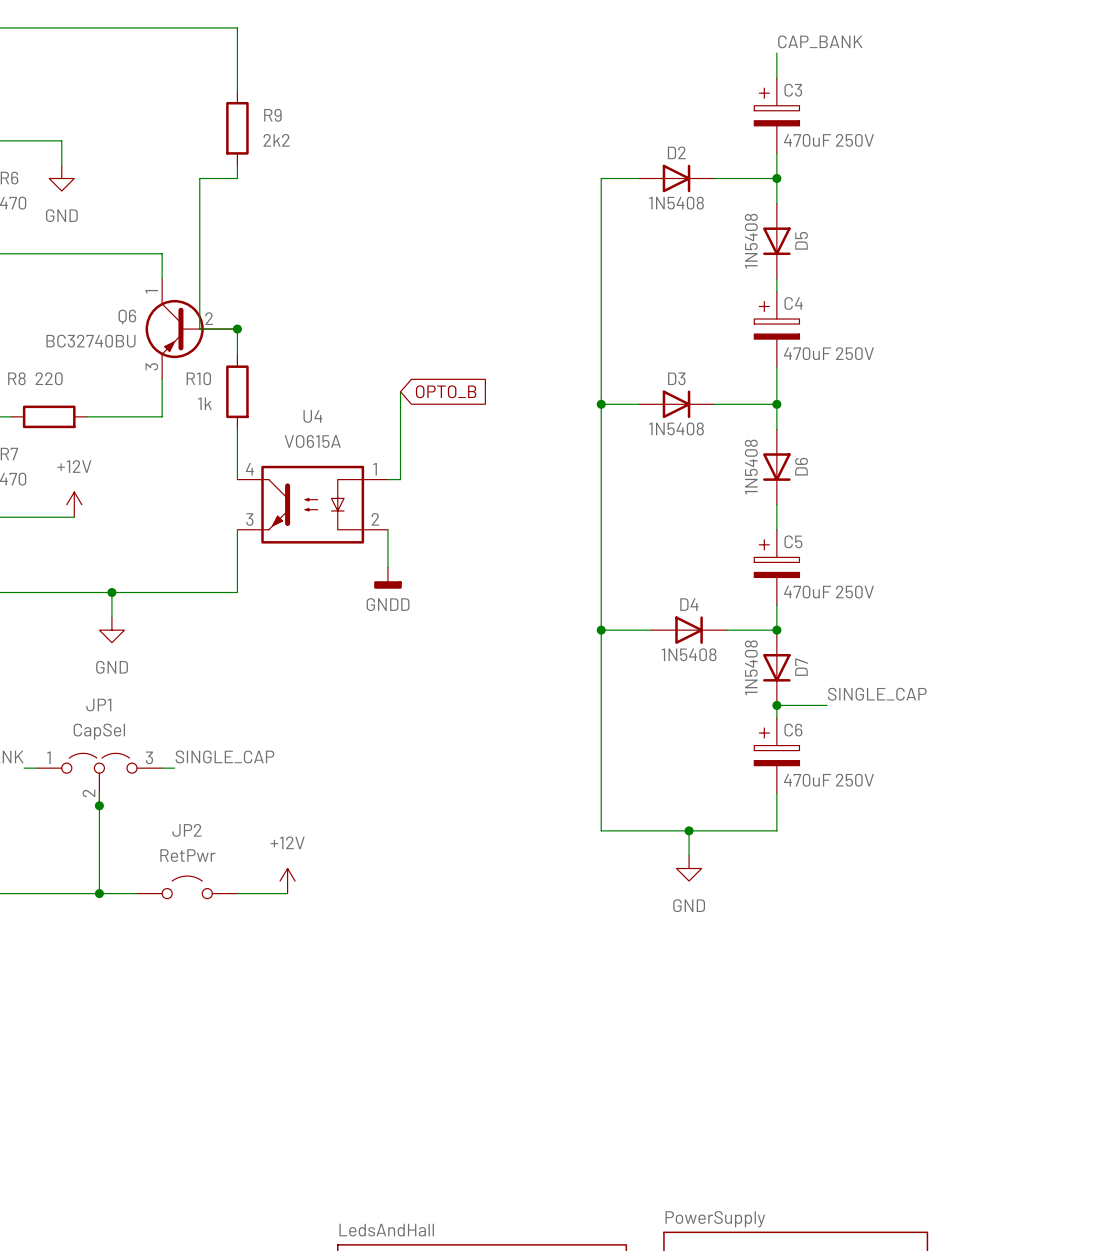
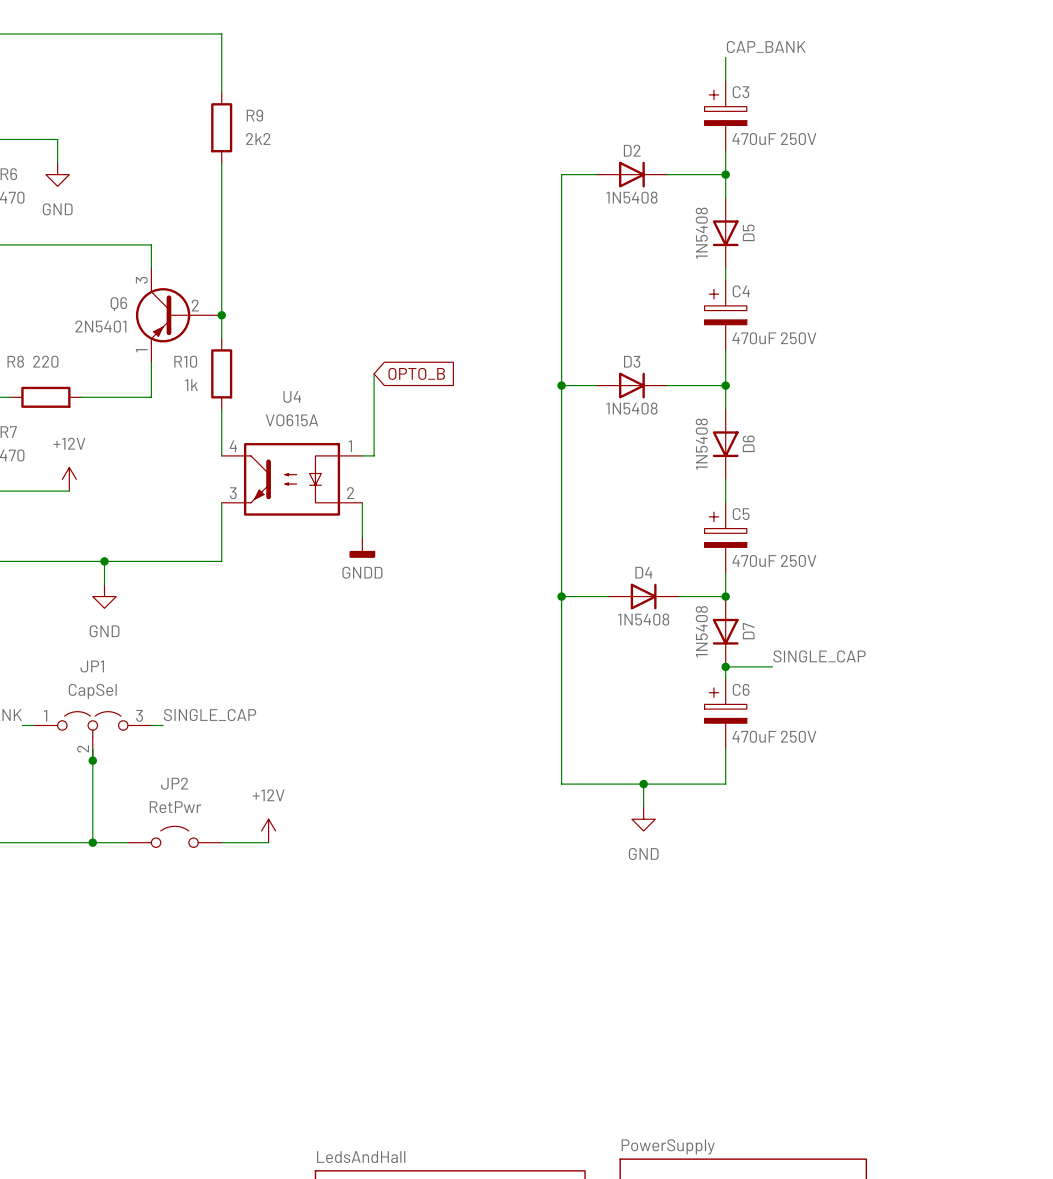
wire: (237, 178) (199, 178) (199, 329) (237, 329) -> (221, 174) (221, 315)
Q6 pin number: 1 (151, 291) -> 3 (141, 280)
Q6 value: BC32740BU (90, 341) -> 2N5401 (100, 326)
Q6 pin number: 3 (151, 366) -> 1 (141, 350)

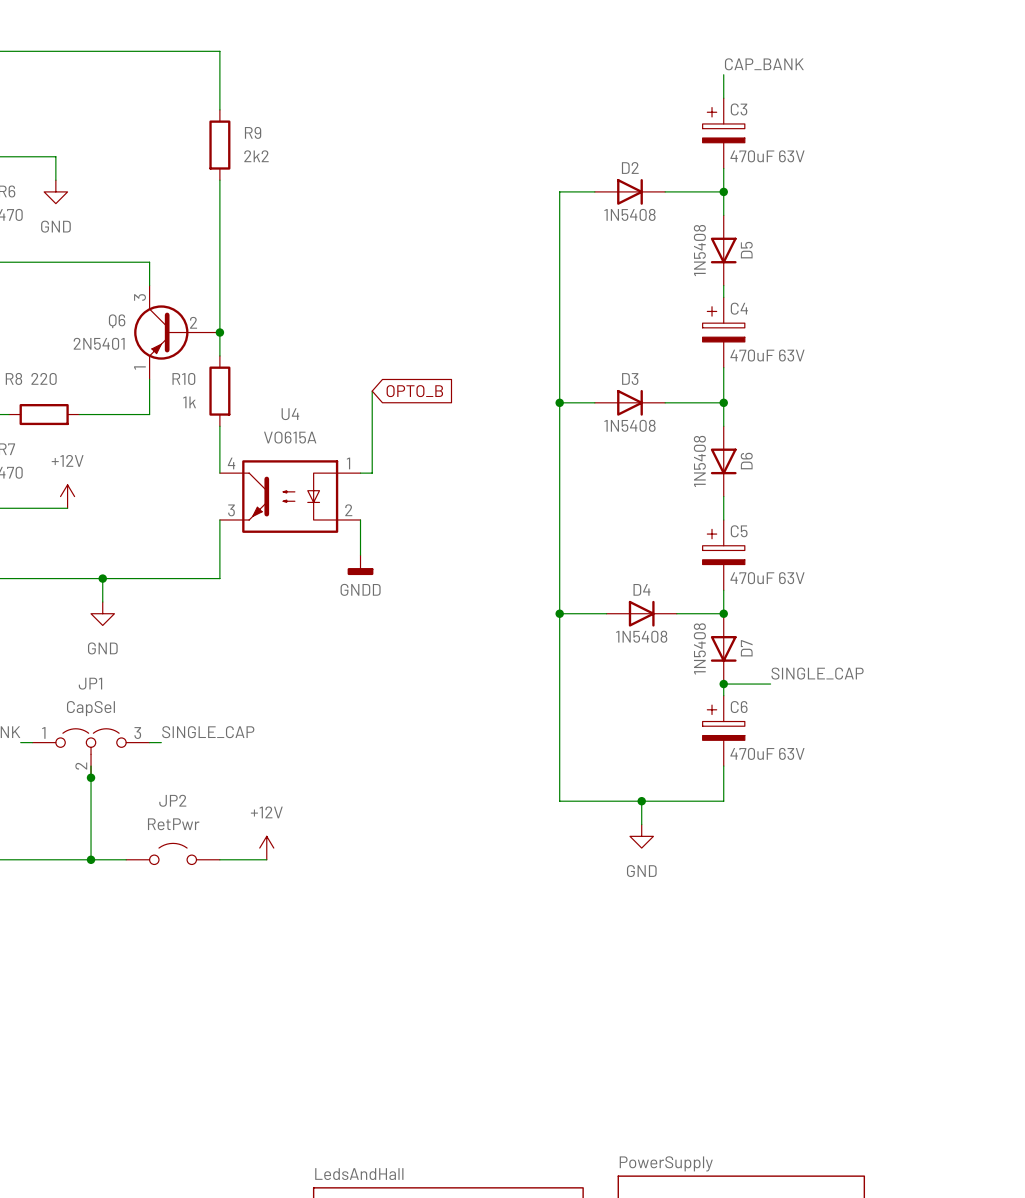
C3 value: 470uF 250V (774, 139) -> 470uF 63V (767, 156)
C4 value: 470uF 250V (774, 338) -> 470uF 63V (767, 355)
C5 value: 470uF 250V (774, 560) -> 470uF 63V (767, 578)
C6 value: 470uF 250V (774, 736) -> 470uF 63V (767, 753)

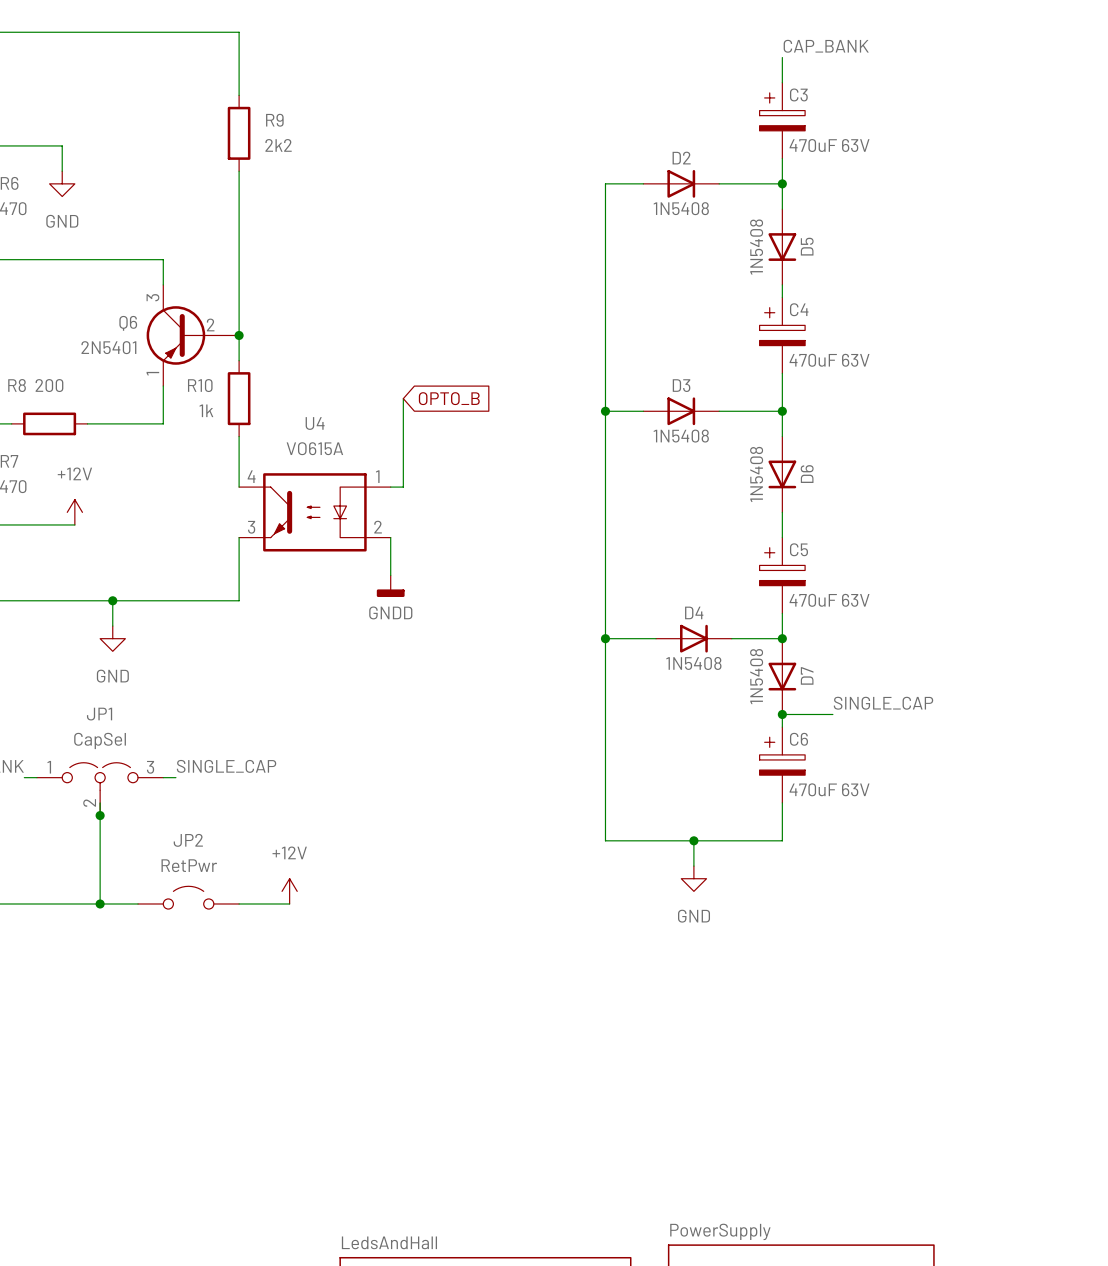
R8 value: 220 (44, 378) -> 200 (49, 385)

